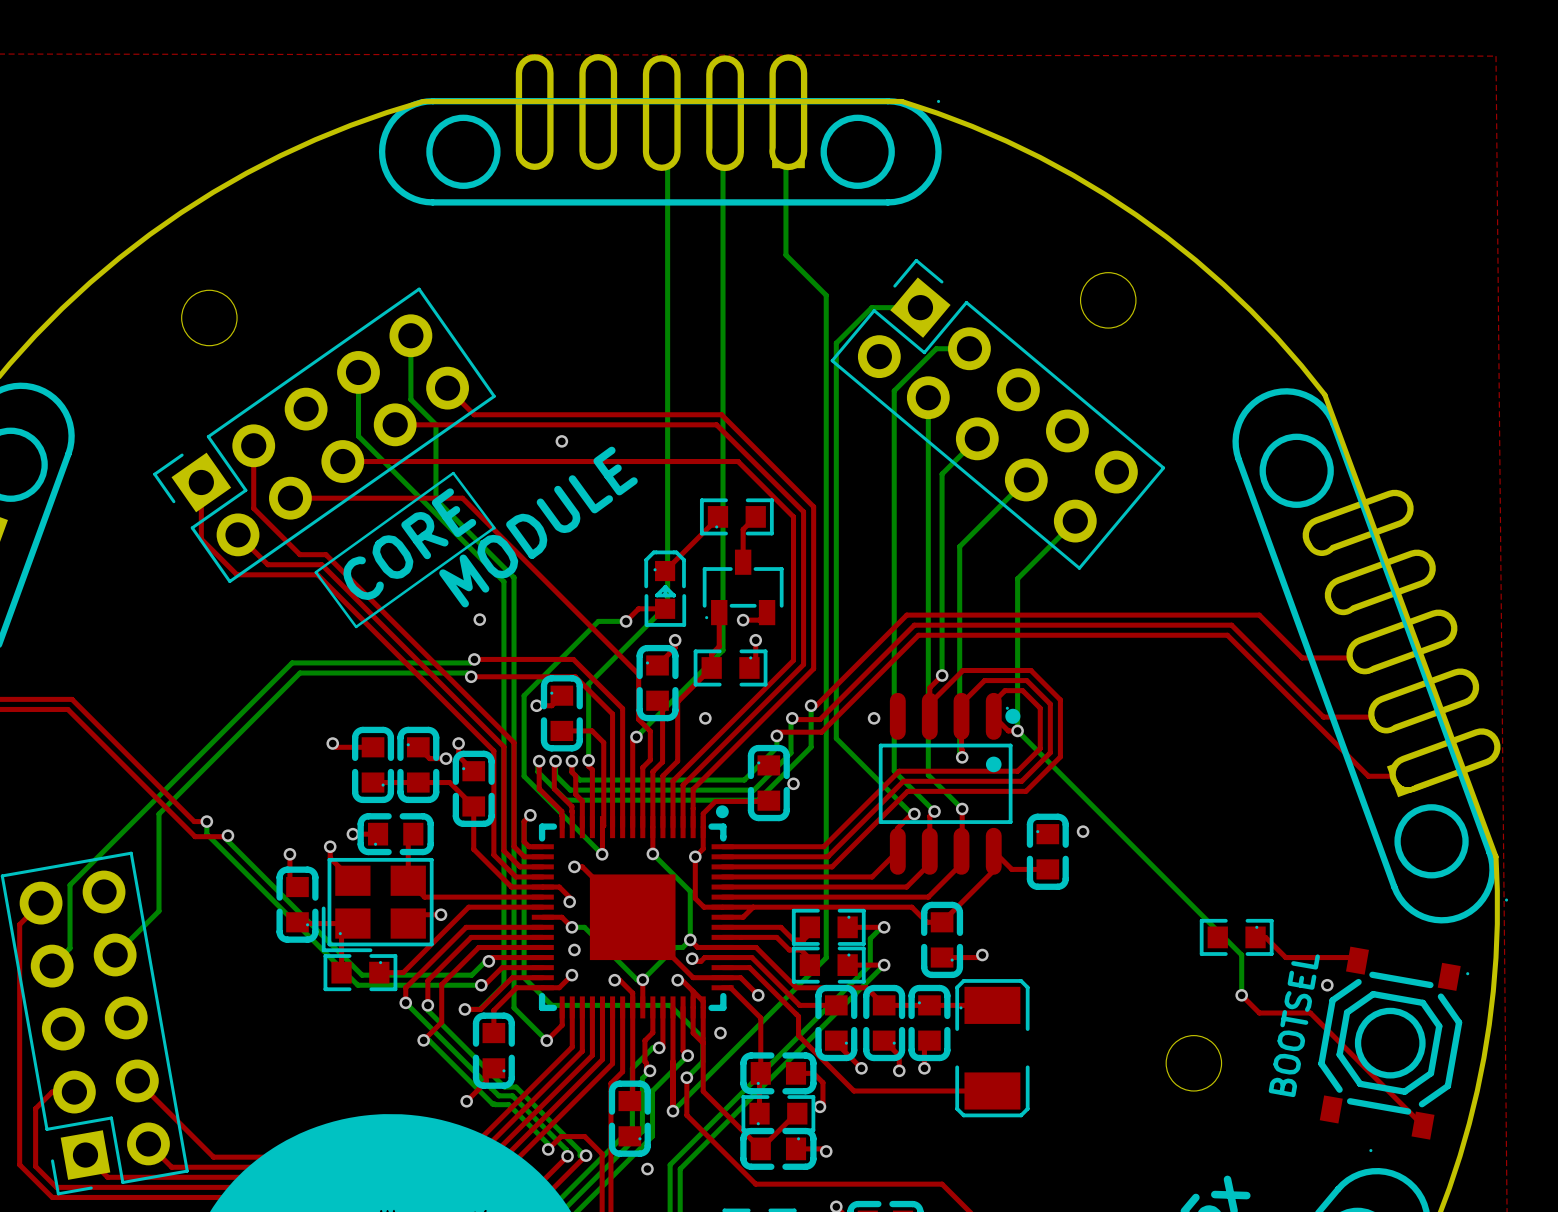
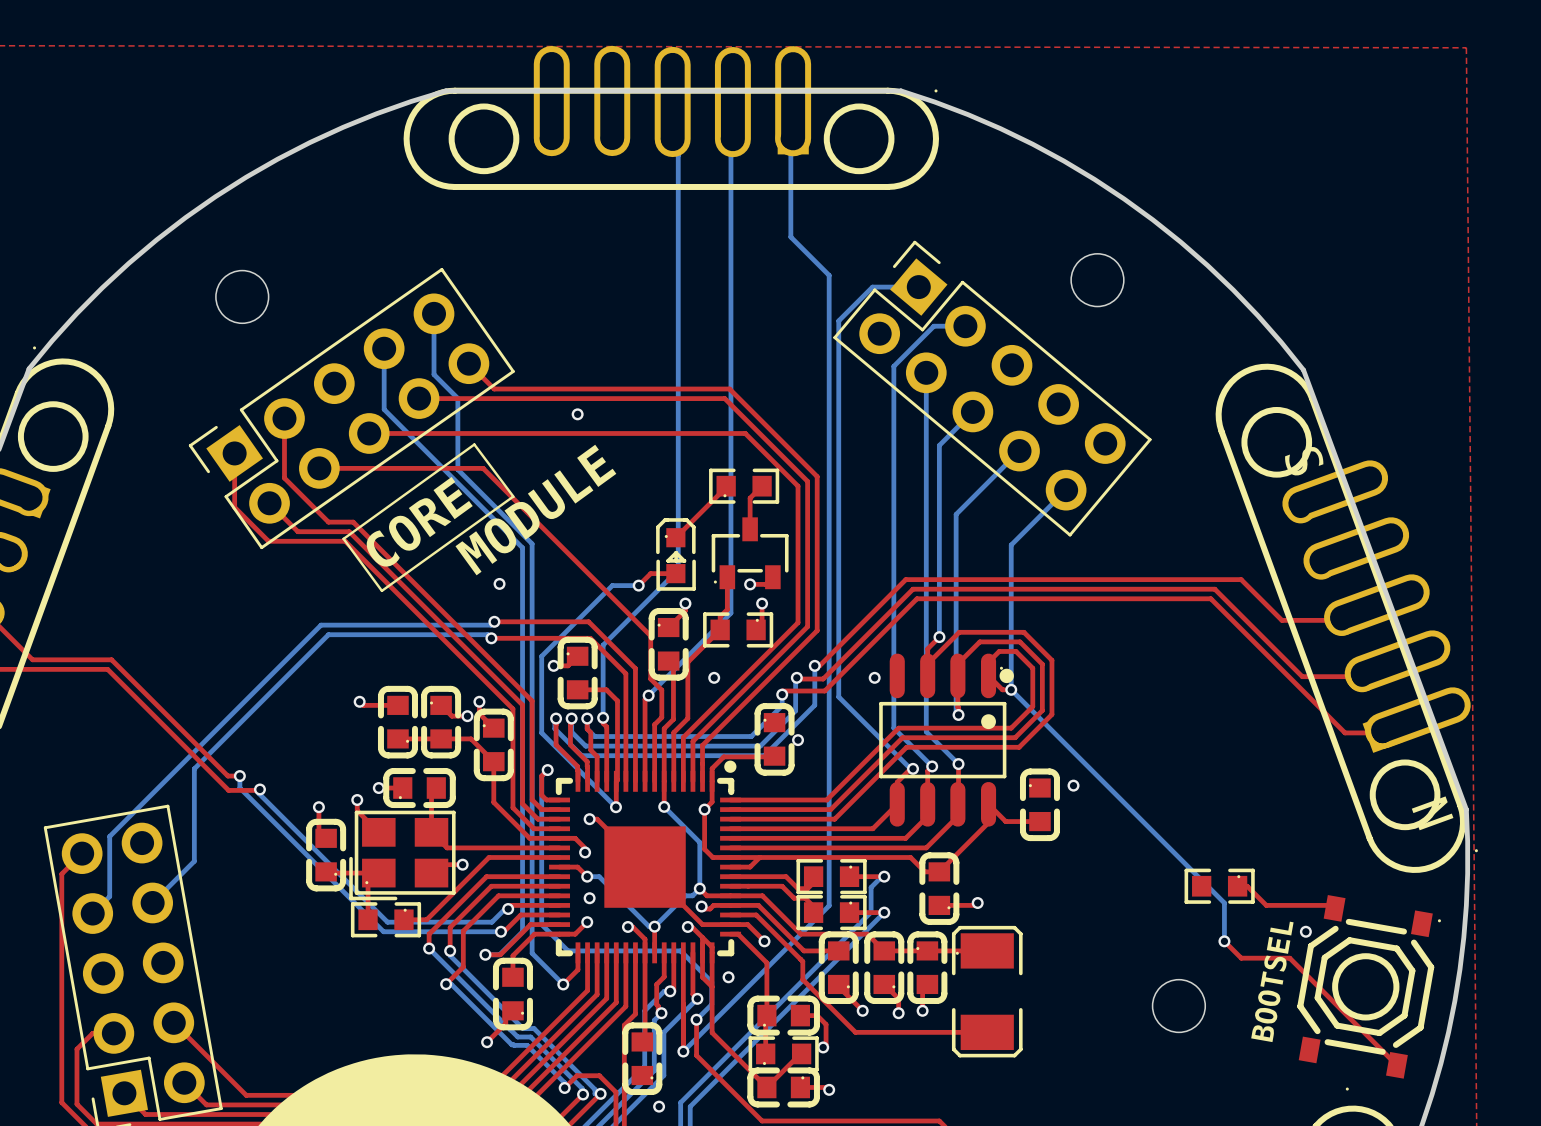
part footprint: [1232, 388, 1509, 924] -> [1215, 363, 1478, 873]

